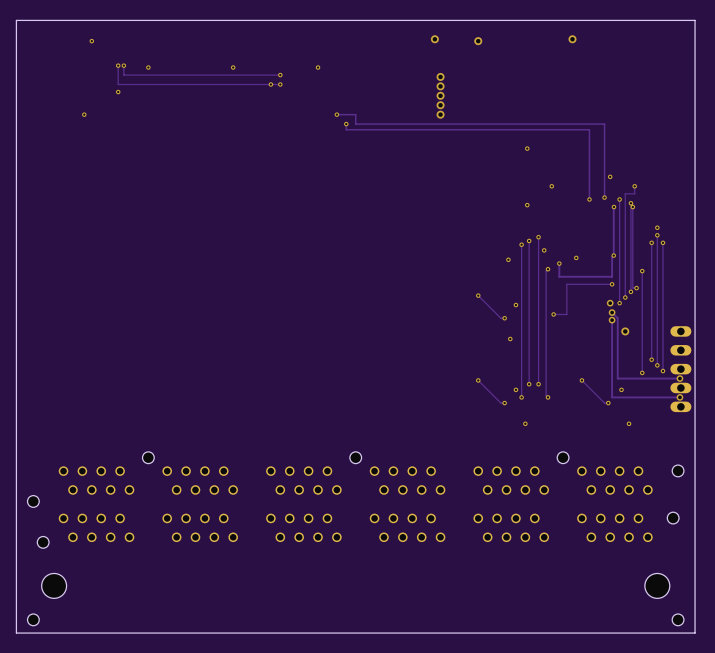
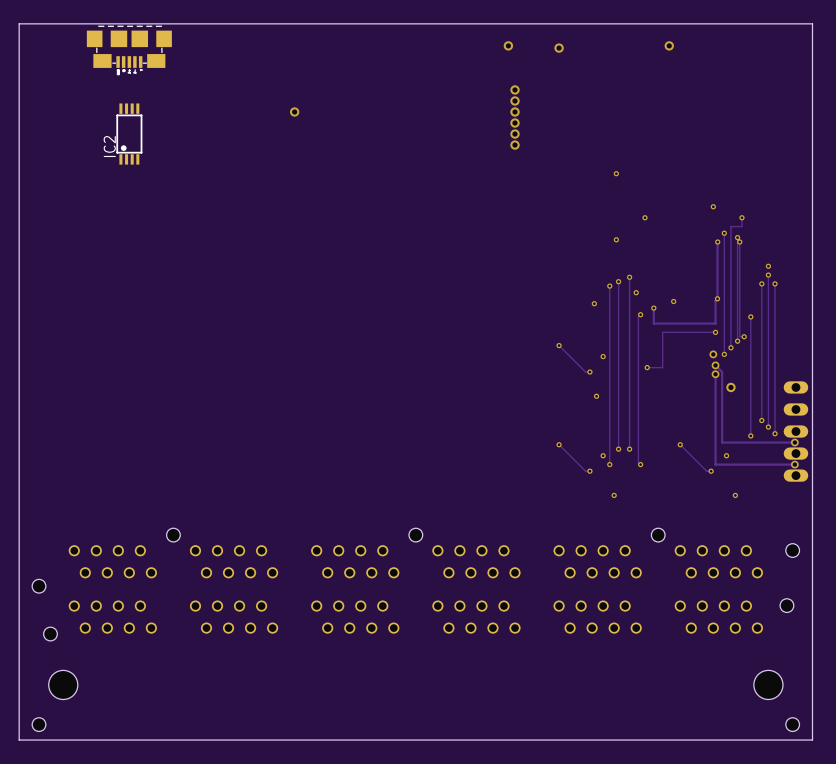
part: none -> (129, 46)
via: (91, 41) -> none
track: (118, 65) (118, 84) (280, 84) -> none
via: (118, 65) -> none
track: (123, 65) (123, 75) (280, 75) -> none
via: (123, 65) -> none
via: (148, 67) -> none
via: (233, 67) -> none
via: (318, 67) -> none
via: (280, 75) -> none
via: (270, 84) -> none
via: (280, 84) -> none
via: (118, 92) -> none
via: none -> (294, 112)
via: (84, 114) -> none
IC2: none -> (129, 134)
track: (336, 114) (355, 114) (355, 124) (604, 124) (604, 197) -> none
via: (336, 114) -> none
track: (346, 124) (346, 129) (589, 129) (589, 199) -> none
via: (346, 124) -> none
via: none -> (515, 145)
via: (604, 197) -> none
via: (589, 199) -> none

